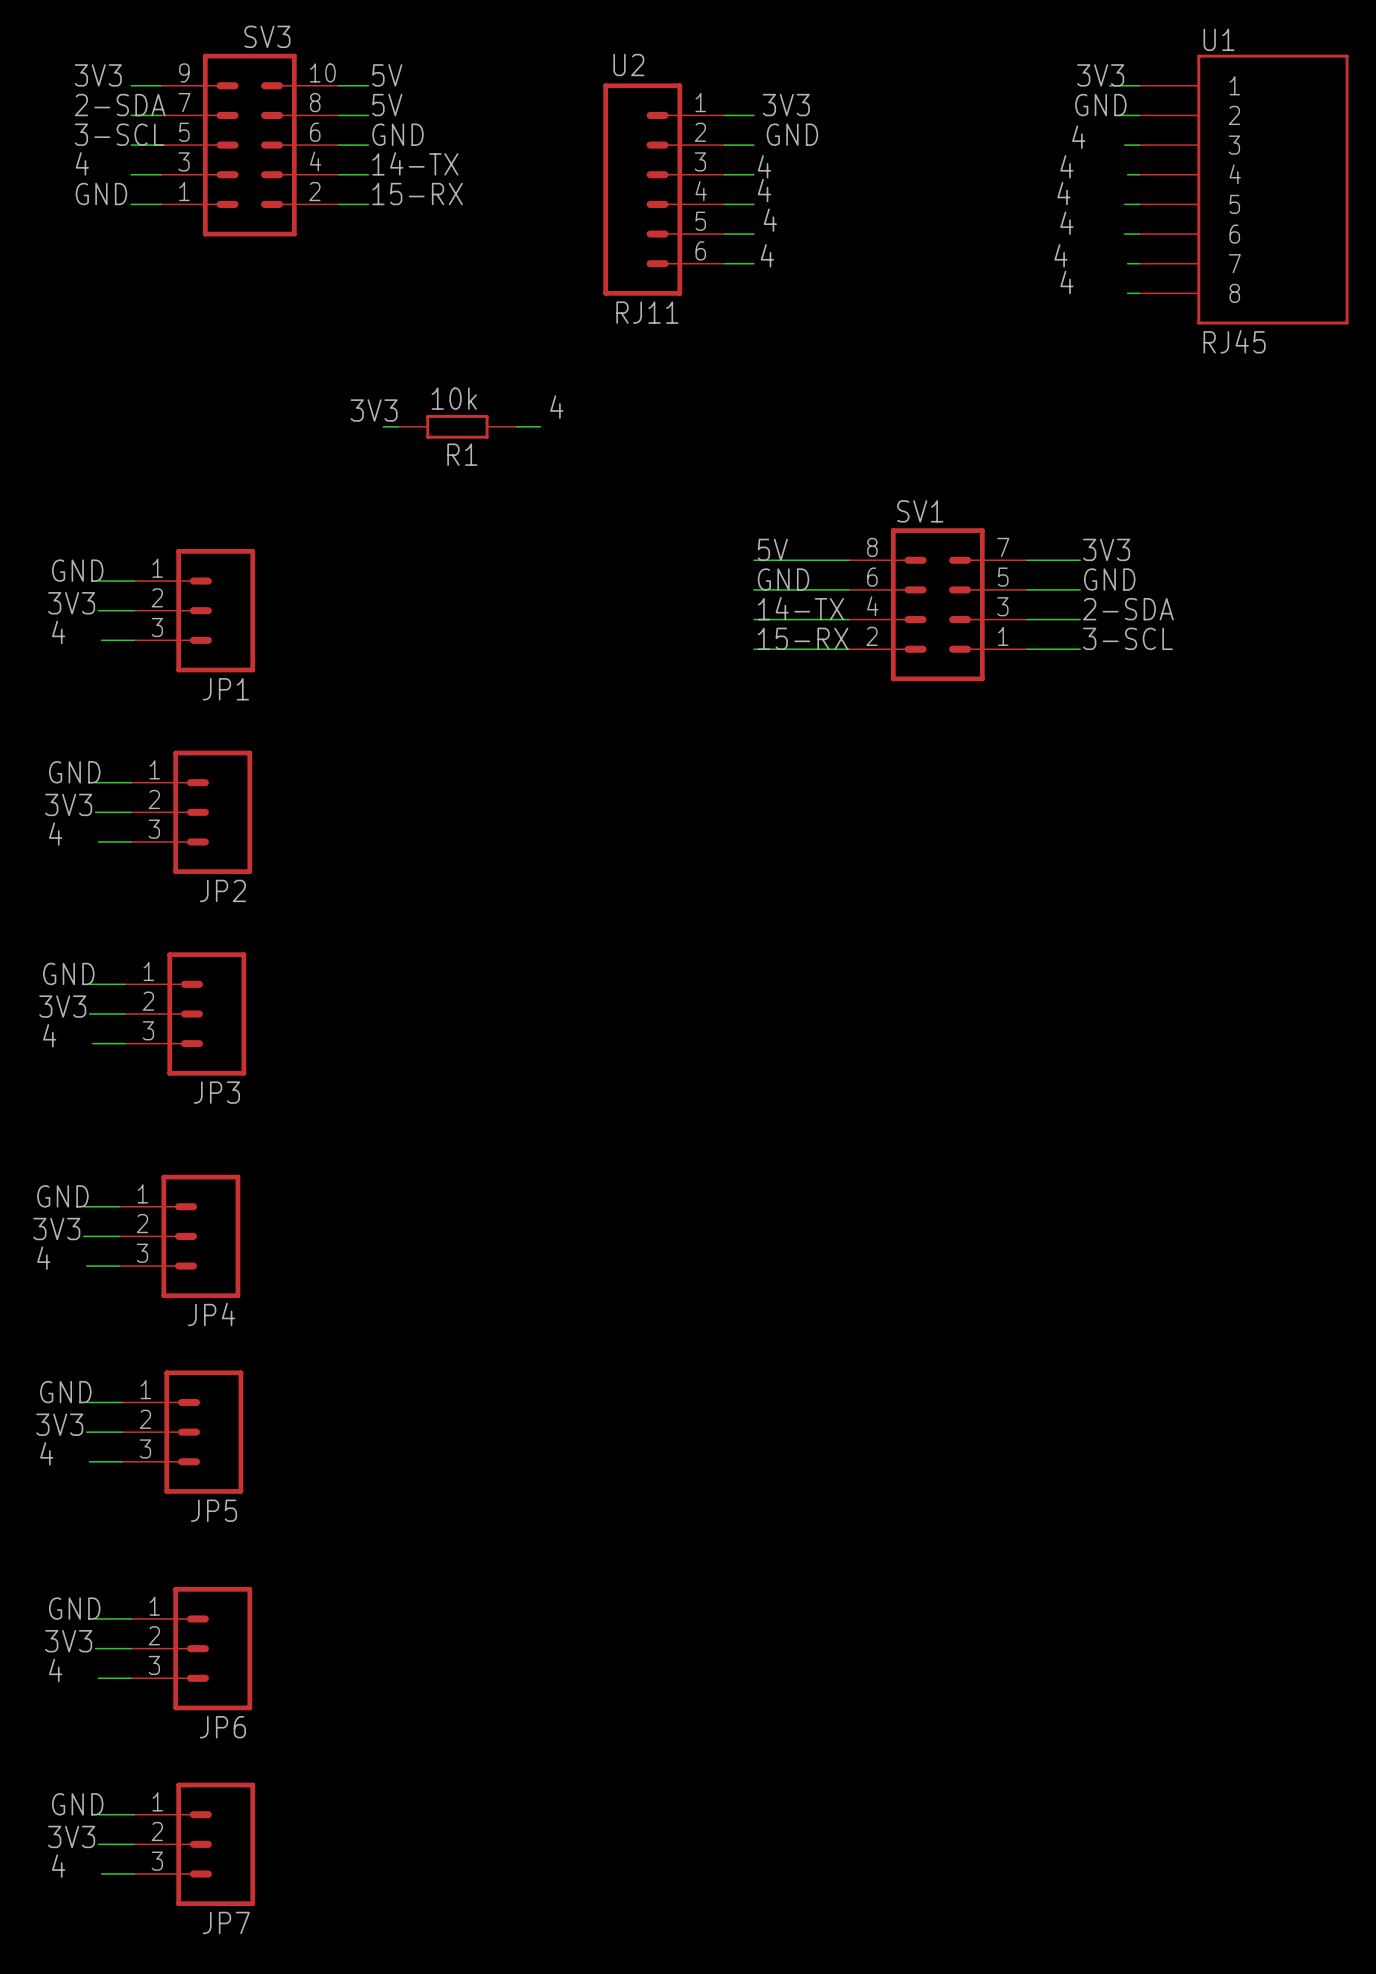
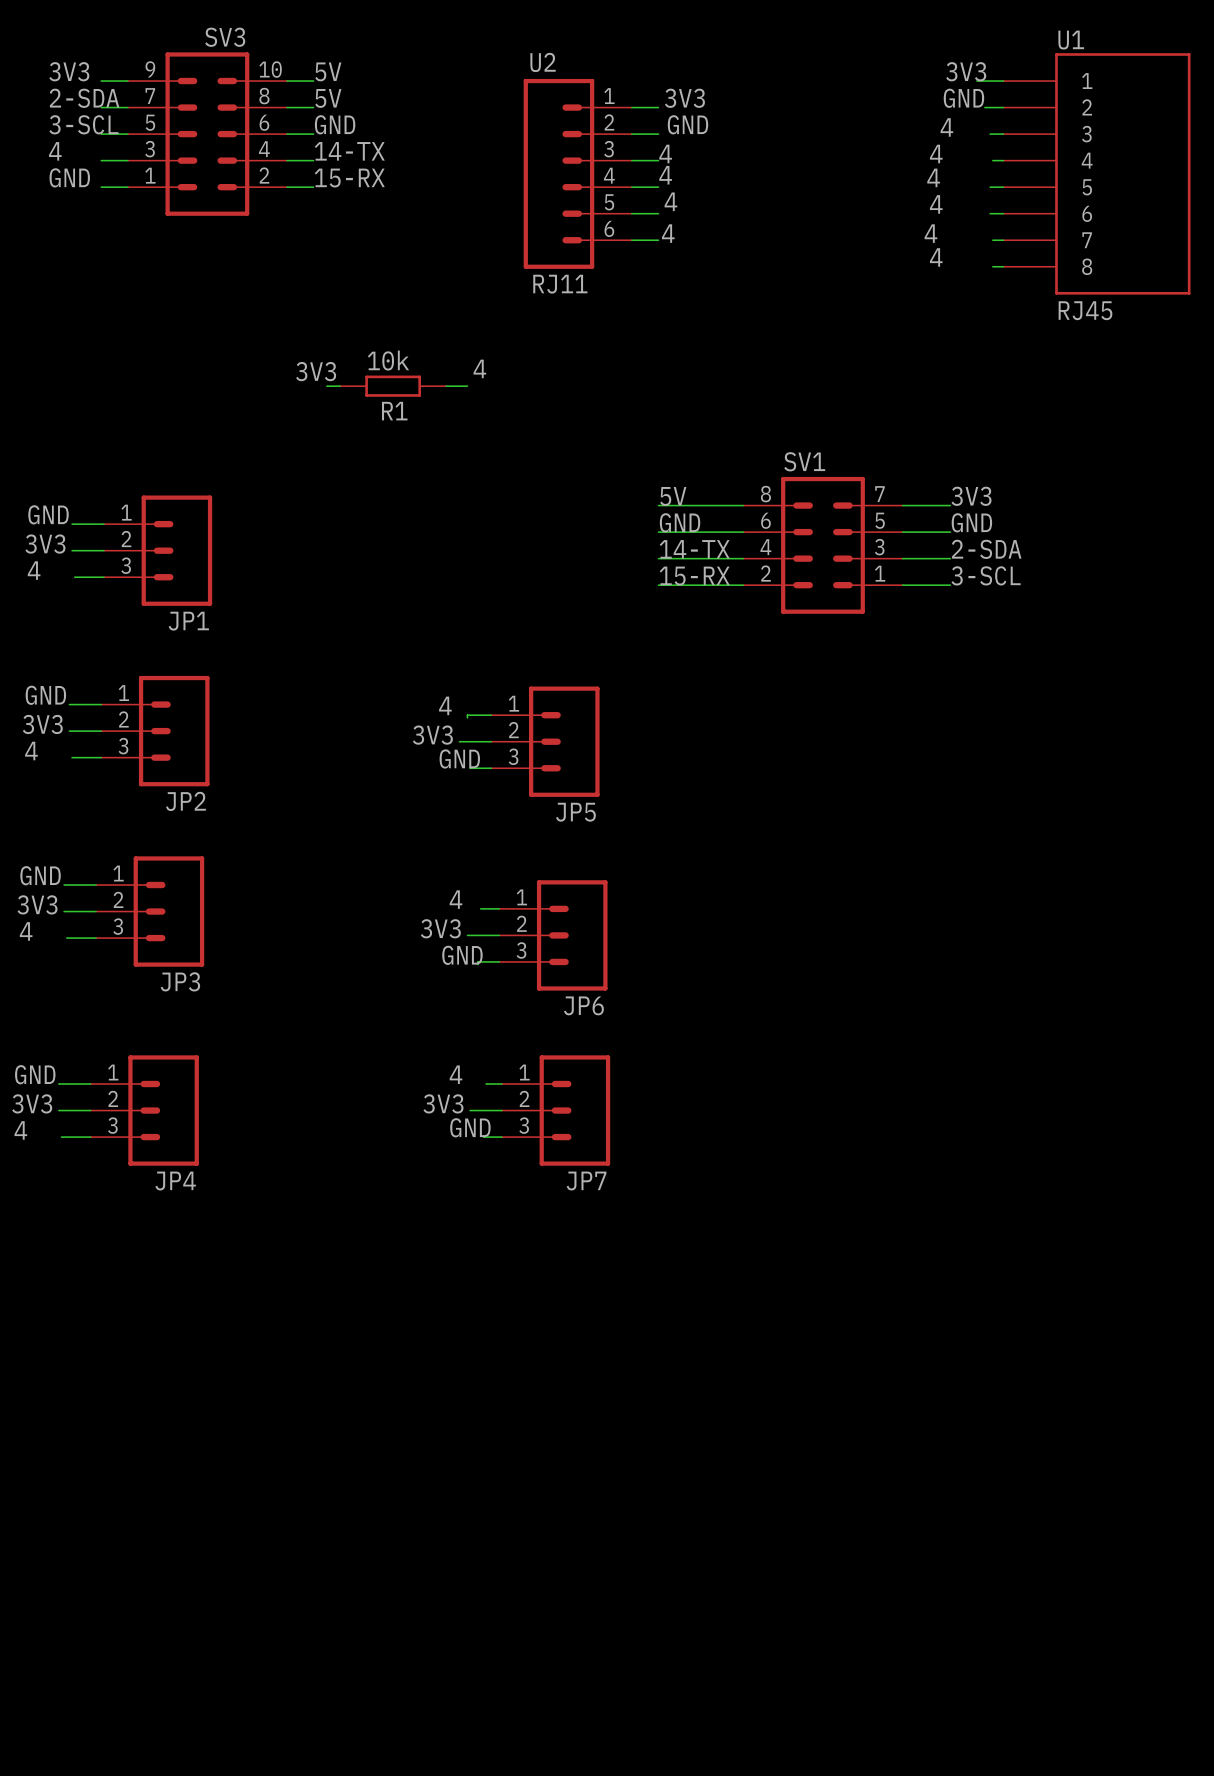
label: none -> 4 (445, 705)
wire: none -> (491, 715) (467, 715) (467, 717)
label: none -> 3V3 (432, 735)
wire: none -> (459, 741) (491, 741)
label: none -> GND (459, 758)
wire: none -> (470, 768) (491, 768)
label: none -> 4 (455, 899)
wire: none -> (480, 908) (499, 908)
label: none -> 3V3 (440, 928)
wire: none -> (467, 935) (499, 935)
label: none -> GND (462, 955)
wire: none -> (499, 961) (478, 961) (478, 964)
label: none -> 4 (455, 1074)
wire: none -> (486, 1084) (501, 1084)
label: none -> 3V3 (443, 1103)
wire: none -> (470, 1110) (501, 1110)
label: none -> GND (470, 1127)
wire: none -> (483, 1137) (501, 1137)
label: GND (65, 1392) -> none
wire: (86, 1402) (122, 1402) -> none
label: 3V3 (59, 1424) -> none
wire: (86, 1432) (122, 1432) -> none
JP5 position: (182, 1432) -> (545, 741)
label: 4 (46, 1453) -> none
wire: (89, 1461) (122, 1461) -> none
label: GND (74, 1608) -> none
wire: (95, 1618) (131, 1618) -> none
label: 3V3 (68, 1641) -> none
wire: (95, 1648) (131, 1648) -> none
JP6 position: (191, 1648) -> (553, 935)
label: 4 (55, 1670) -> none
wire: (98, 1678) (131, 1678) -> none
label: GND (77, 1804) -> none
wire: (98, 1814) (134, 1814) -> none
label: 3V3 (71, 1836) -> none
wire: (98, 1844) (134, 1844) -> none
JP7 position: (194, 1844) -> (556, 1110)
label: 4 (58, 1866) -> none
wire: (101, 1874) (134, 1874) -> none

